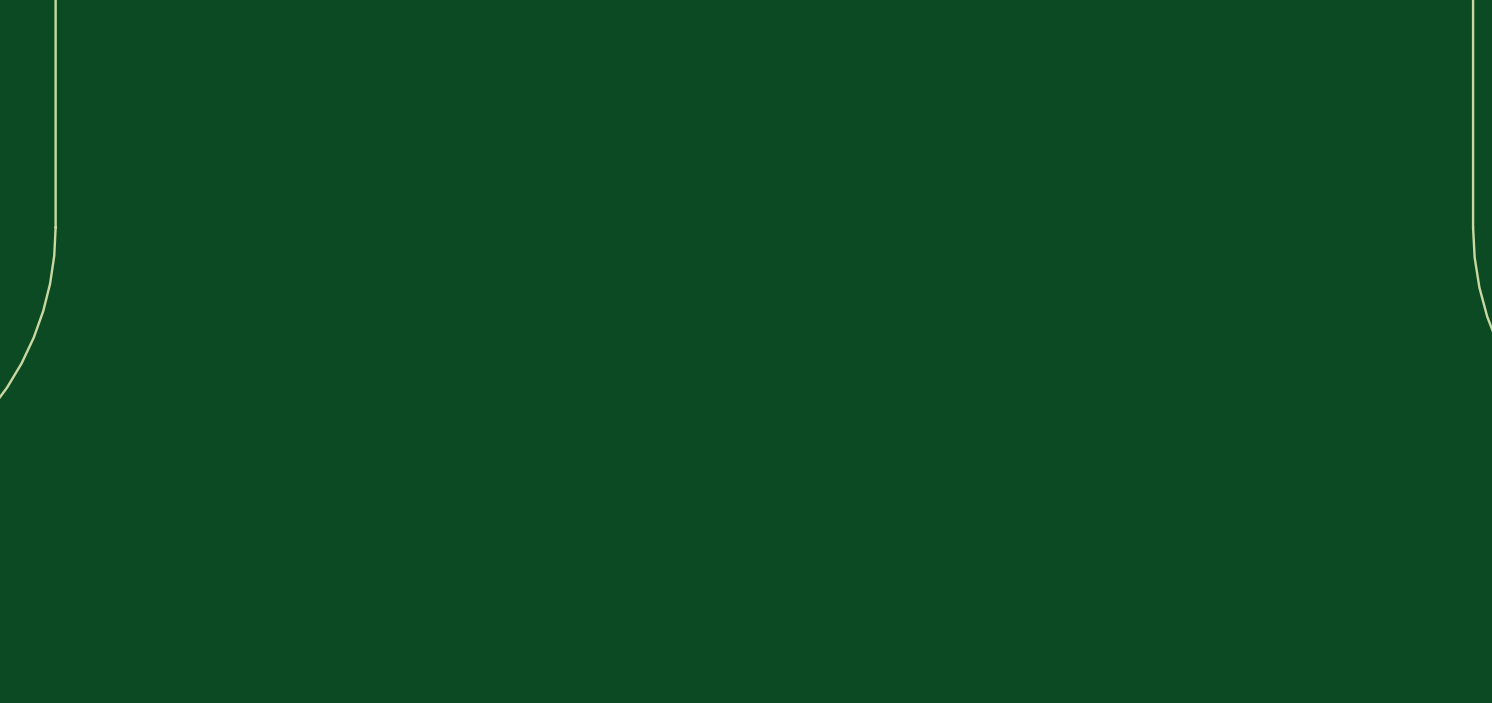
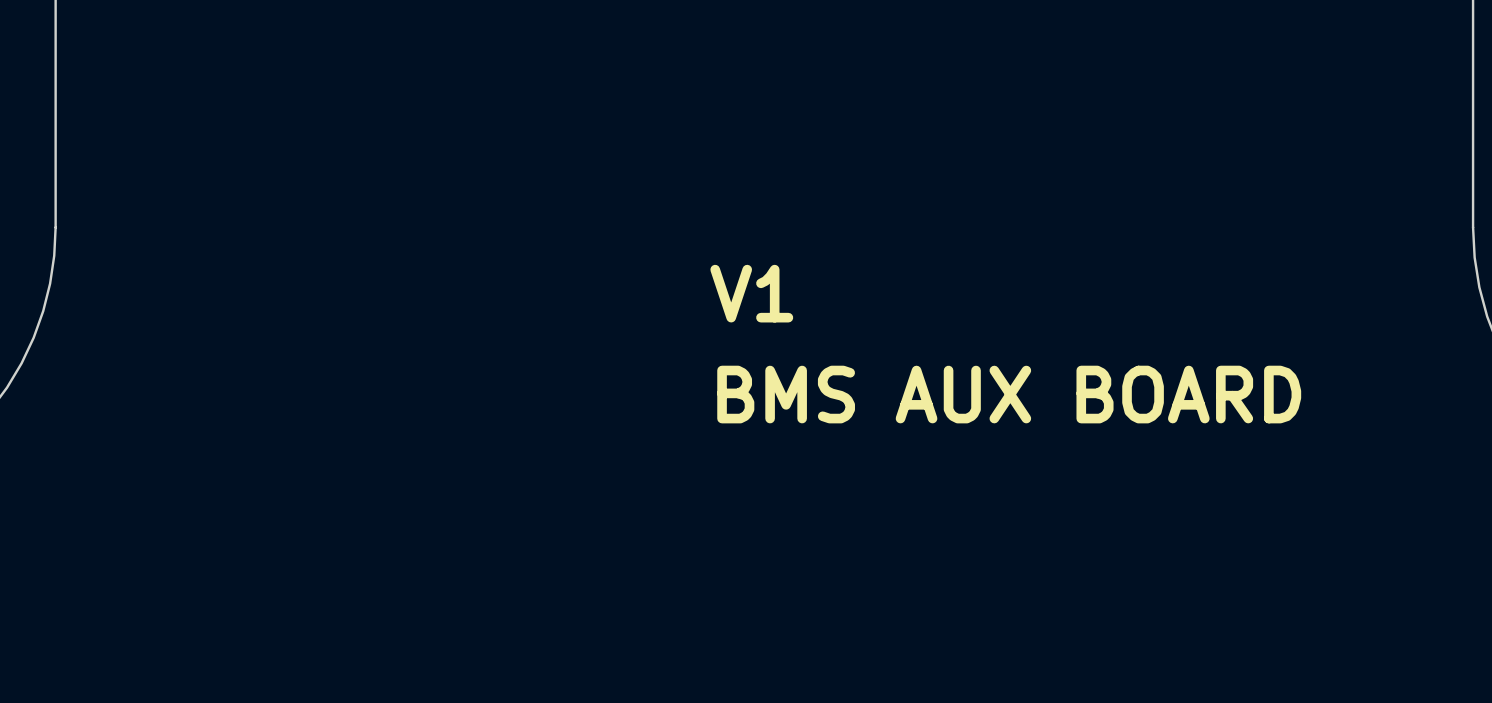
text: none -> V1 (751, 293)
text: none -> BMS AUX BOARD (1009, 394)

